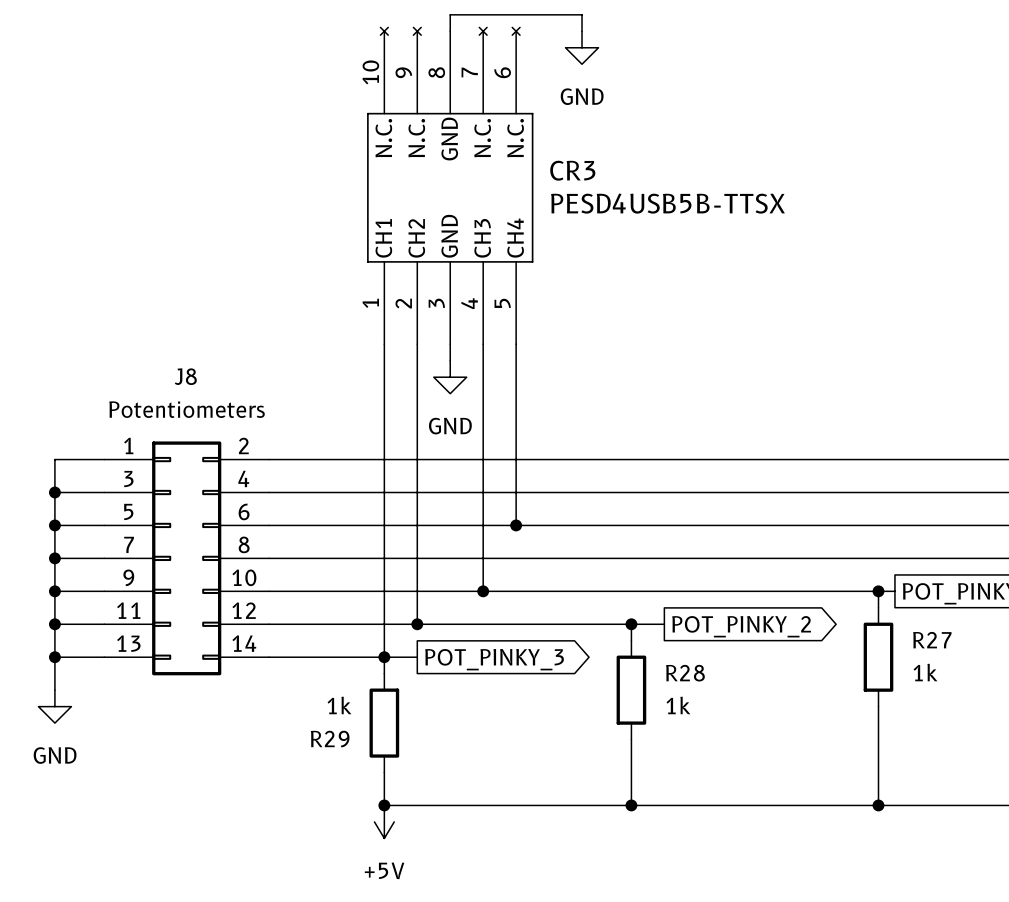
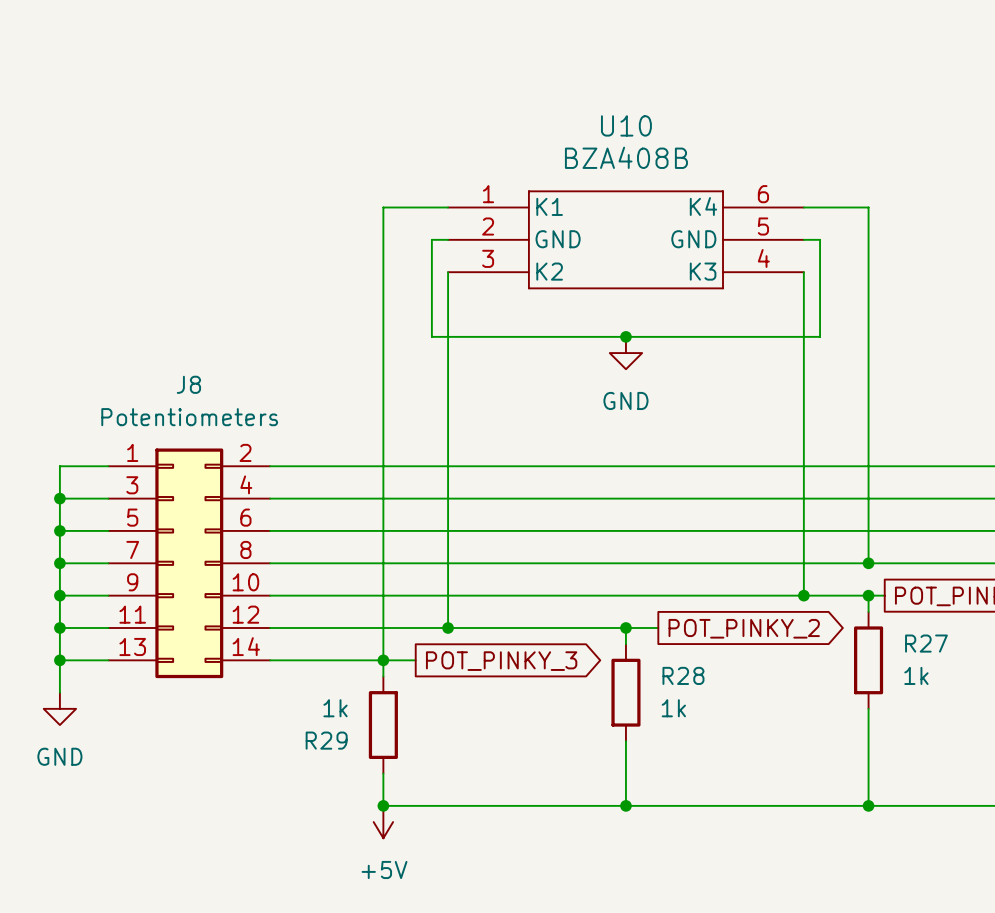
wire: (450, 31) (450, 14) (582, 14) (582, 31) -> none
power symbol: GND (582, 47) -> none
CR3: PESD4USB5B-TTSX (450, 185) -> none
wire: none -> (448, 207) (383, 207) (383, 353)
wire: none -> (803, 207) (868, 207) (868, 563)
wire: none -> (448, 239) (431, 239) (431, 336) (820, 336) (820, 239) (803, 239)
U10: none -> BZA408B (625, 239)
wire: none -> (803, 272) (803, 595)
junction: none -> (625, 336)
wire: (417, 344) (417, 624) -> none
wire: (483, 344) (483, 591) -> none
wire: (516, 344) (516, 525) -> none
power symbol: none -> GND (625, 353)
wire: none -> (448, 369) (448, 627)
power symbol: GND (450, 377) -> none
junction: (516, 525) -> none
junction: none -> (868, 563)
junction: (483, 591) -> none
junction: none -> (803, 595)
junction: (417, 624) -> none
junction: none -> (448, 627)

